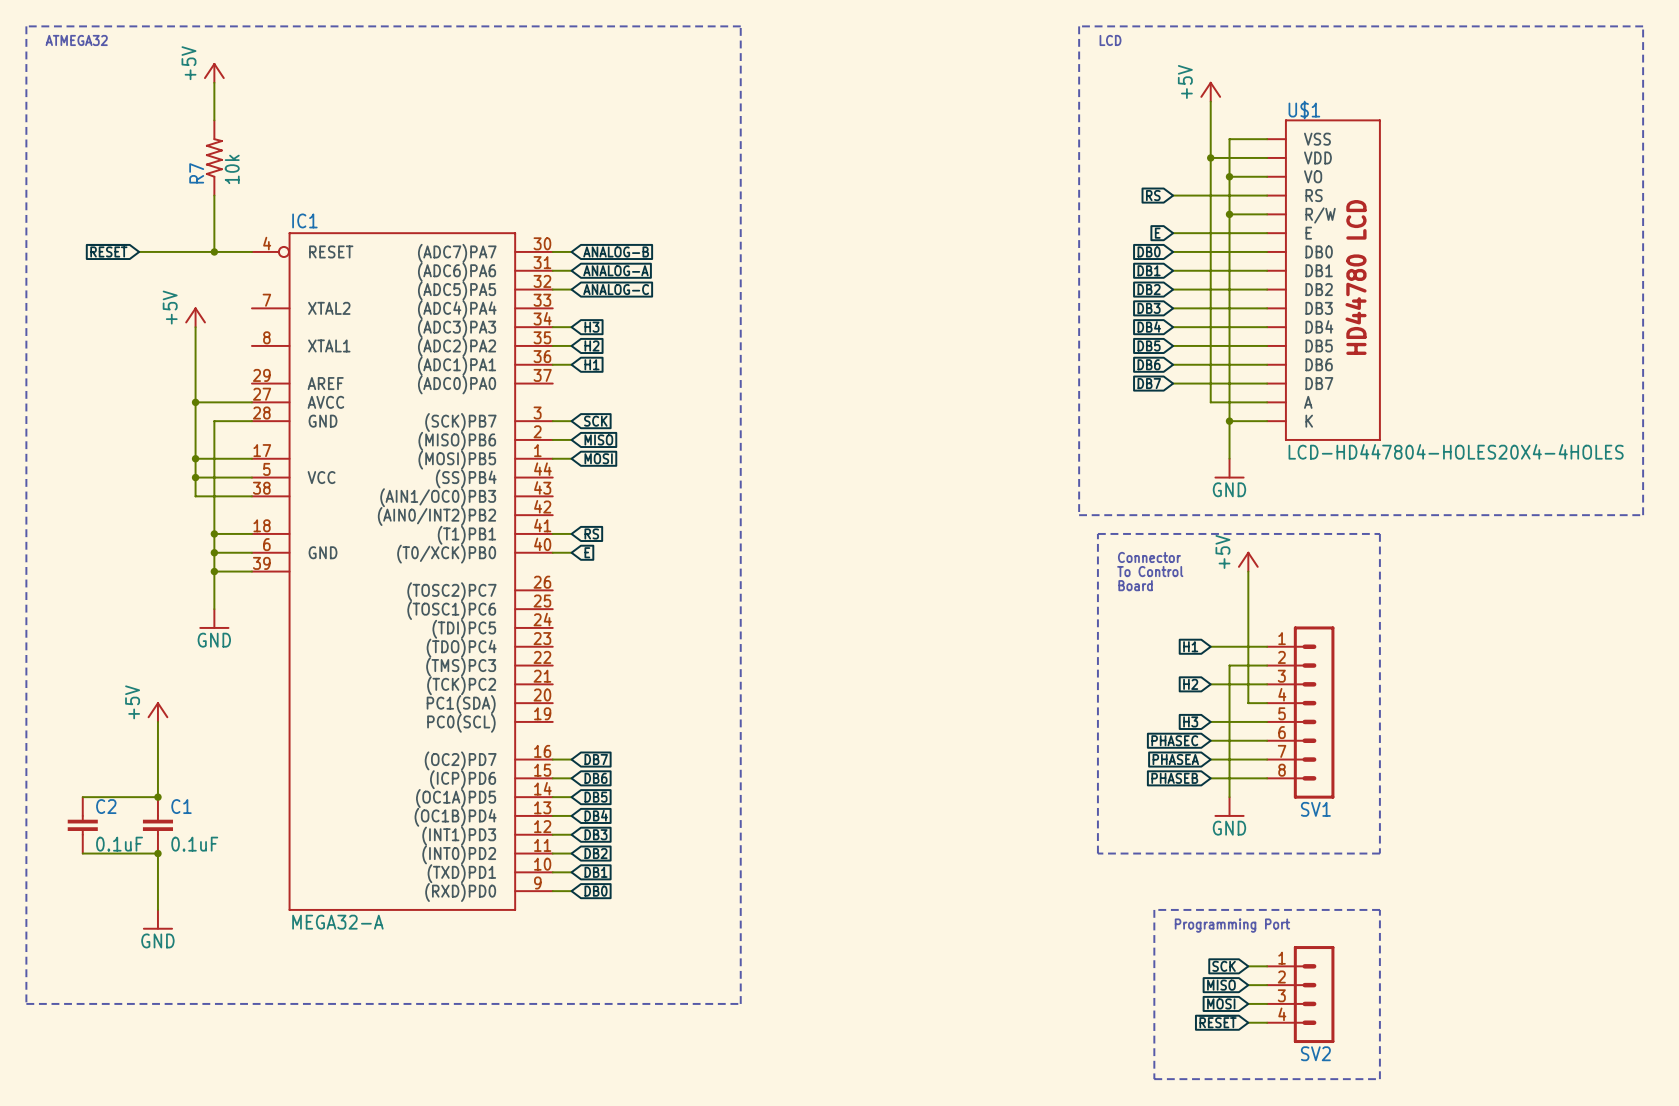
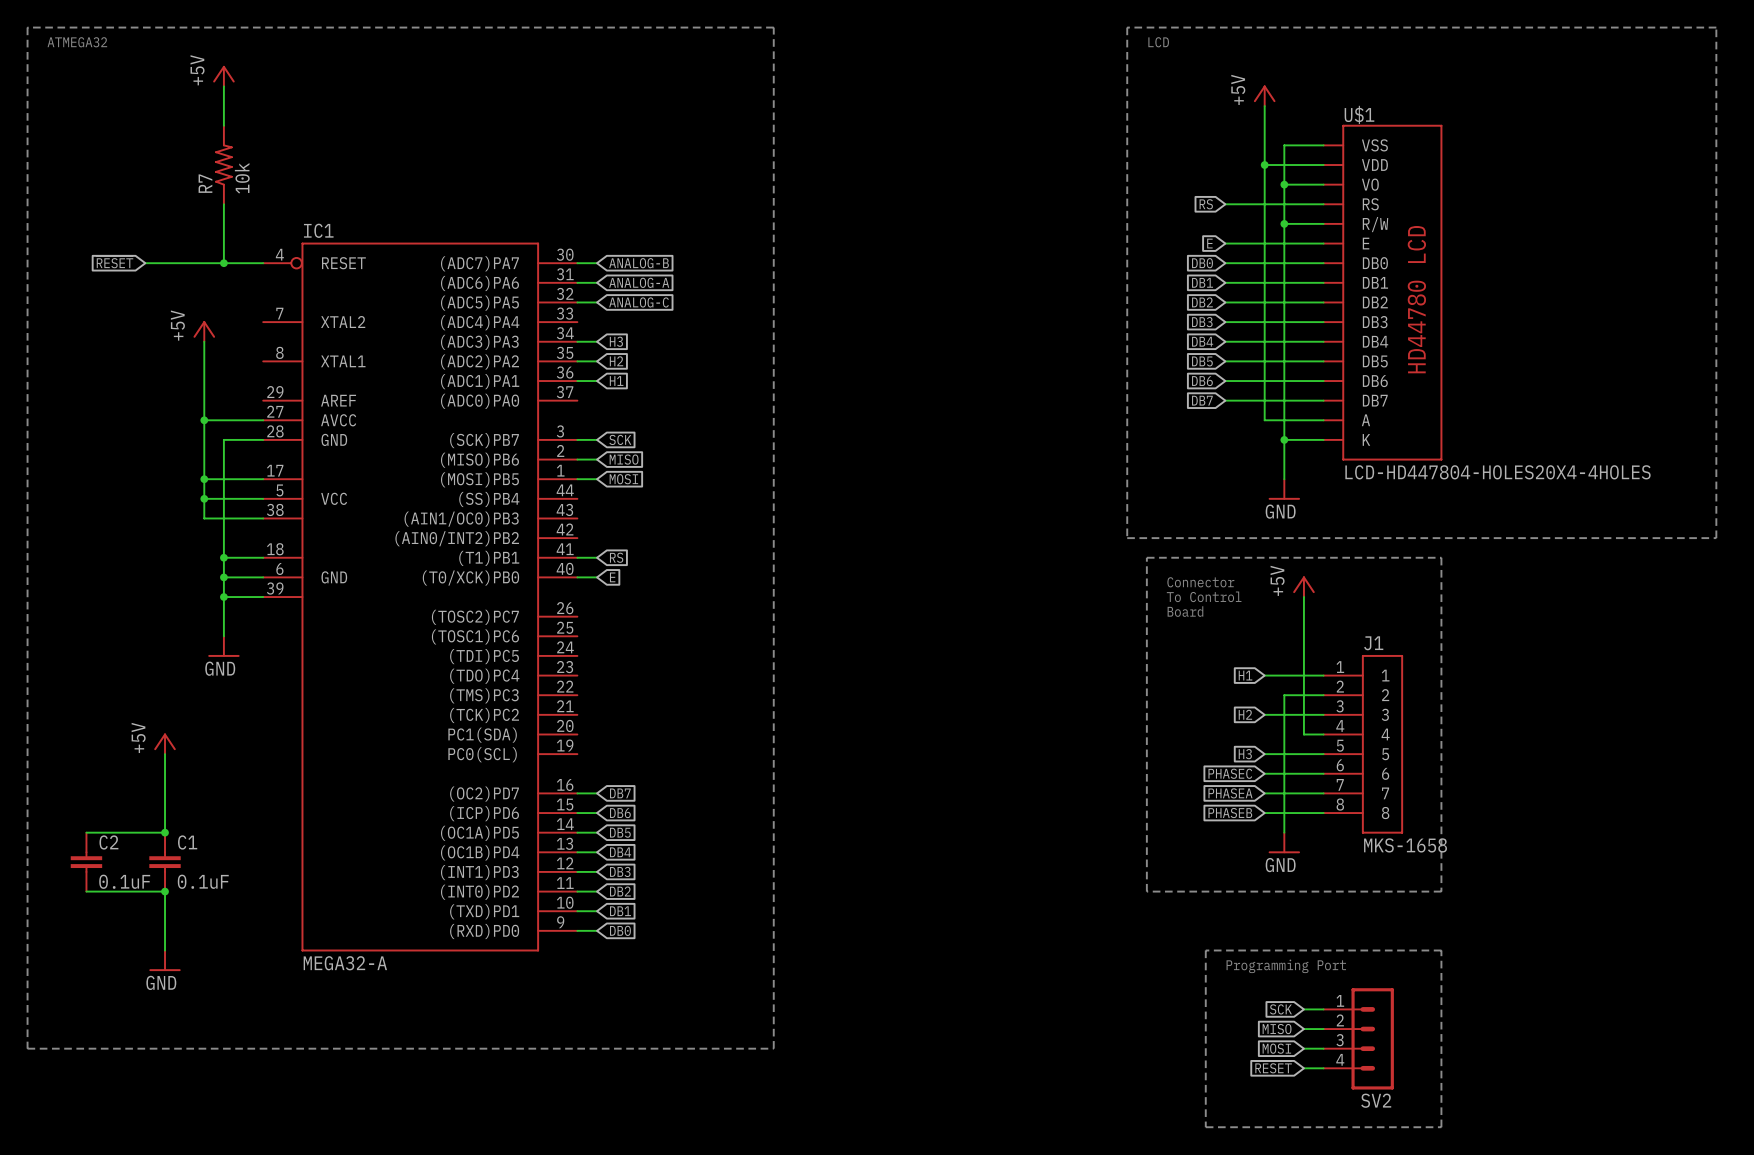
SV1: (1300, 712) -> none
J1: none -> MKS-1658 (1363, 744)

